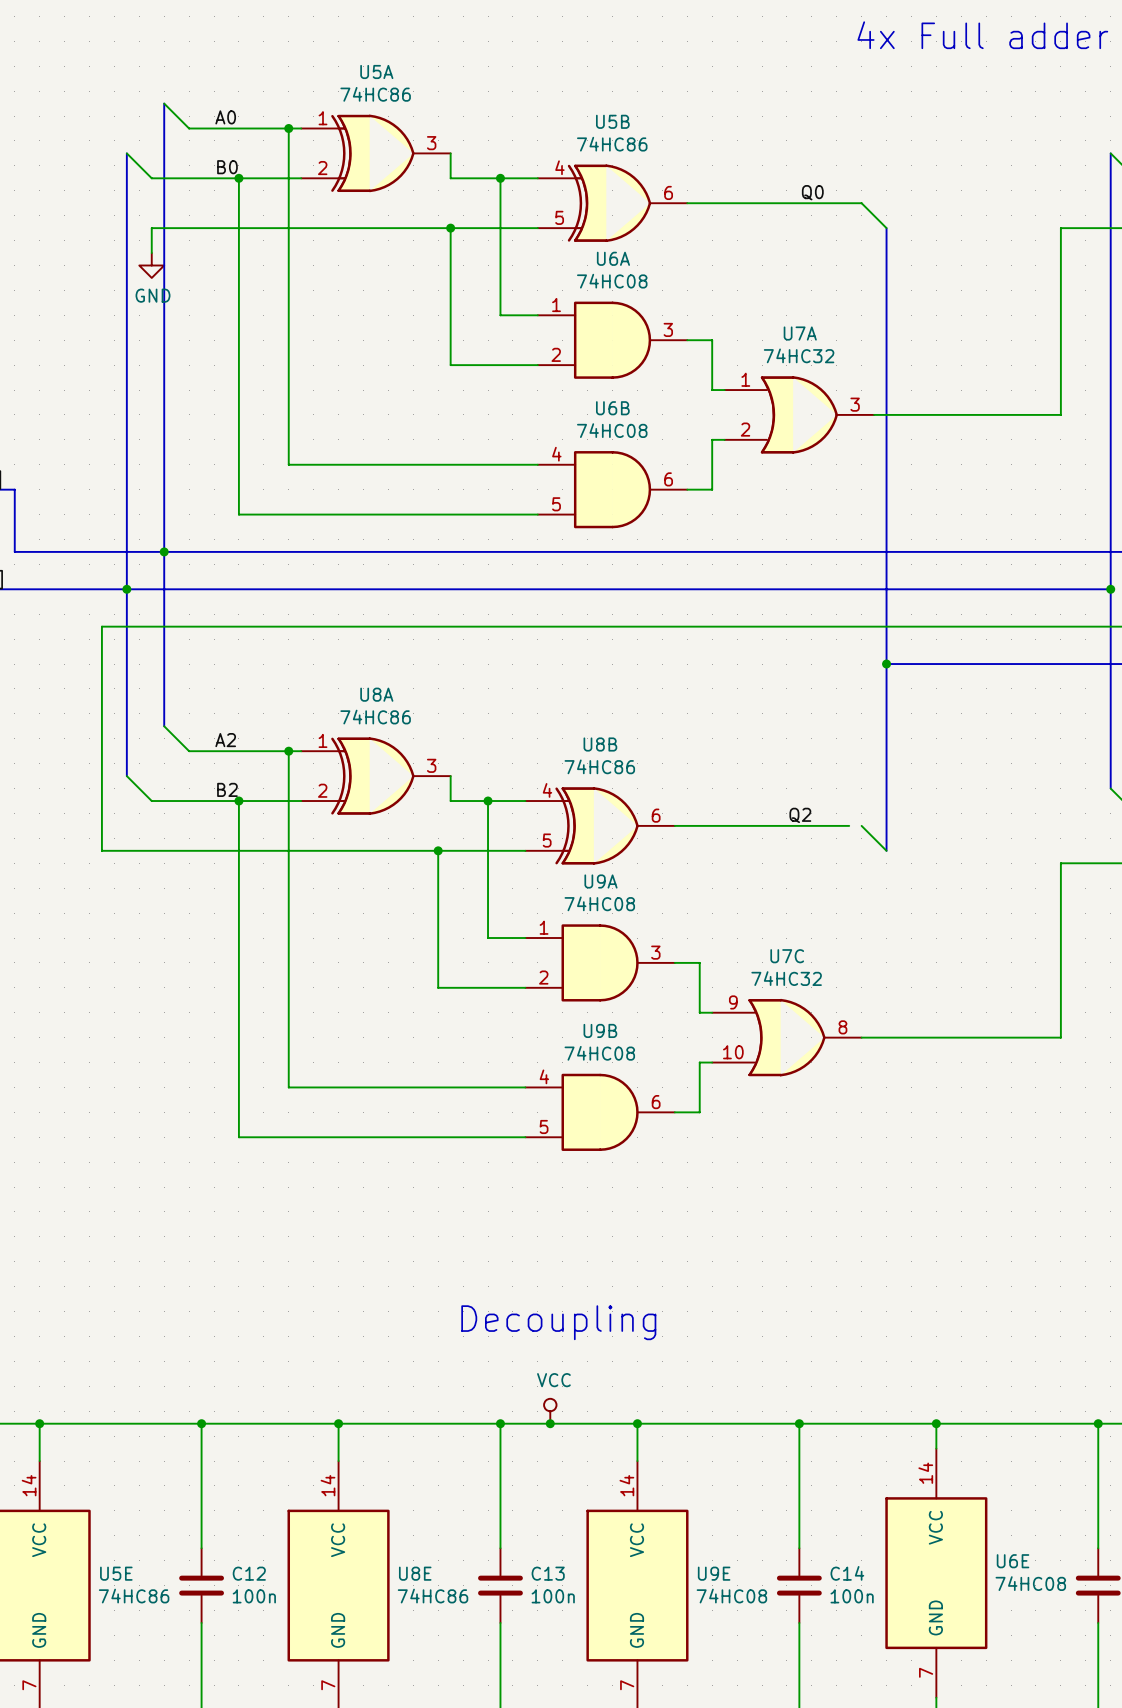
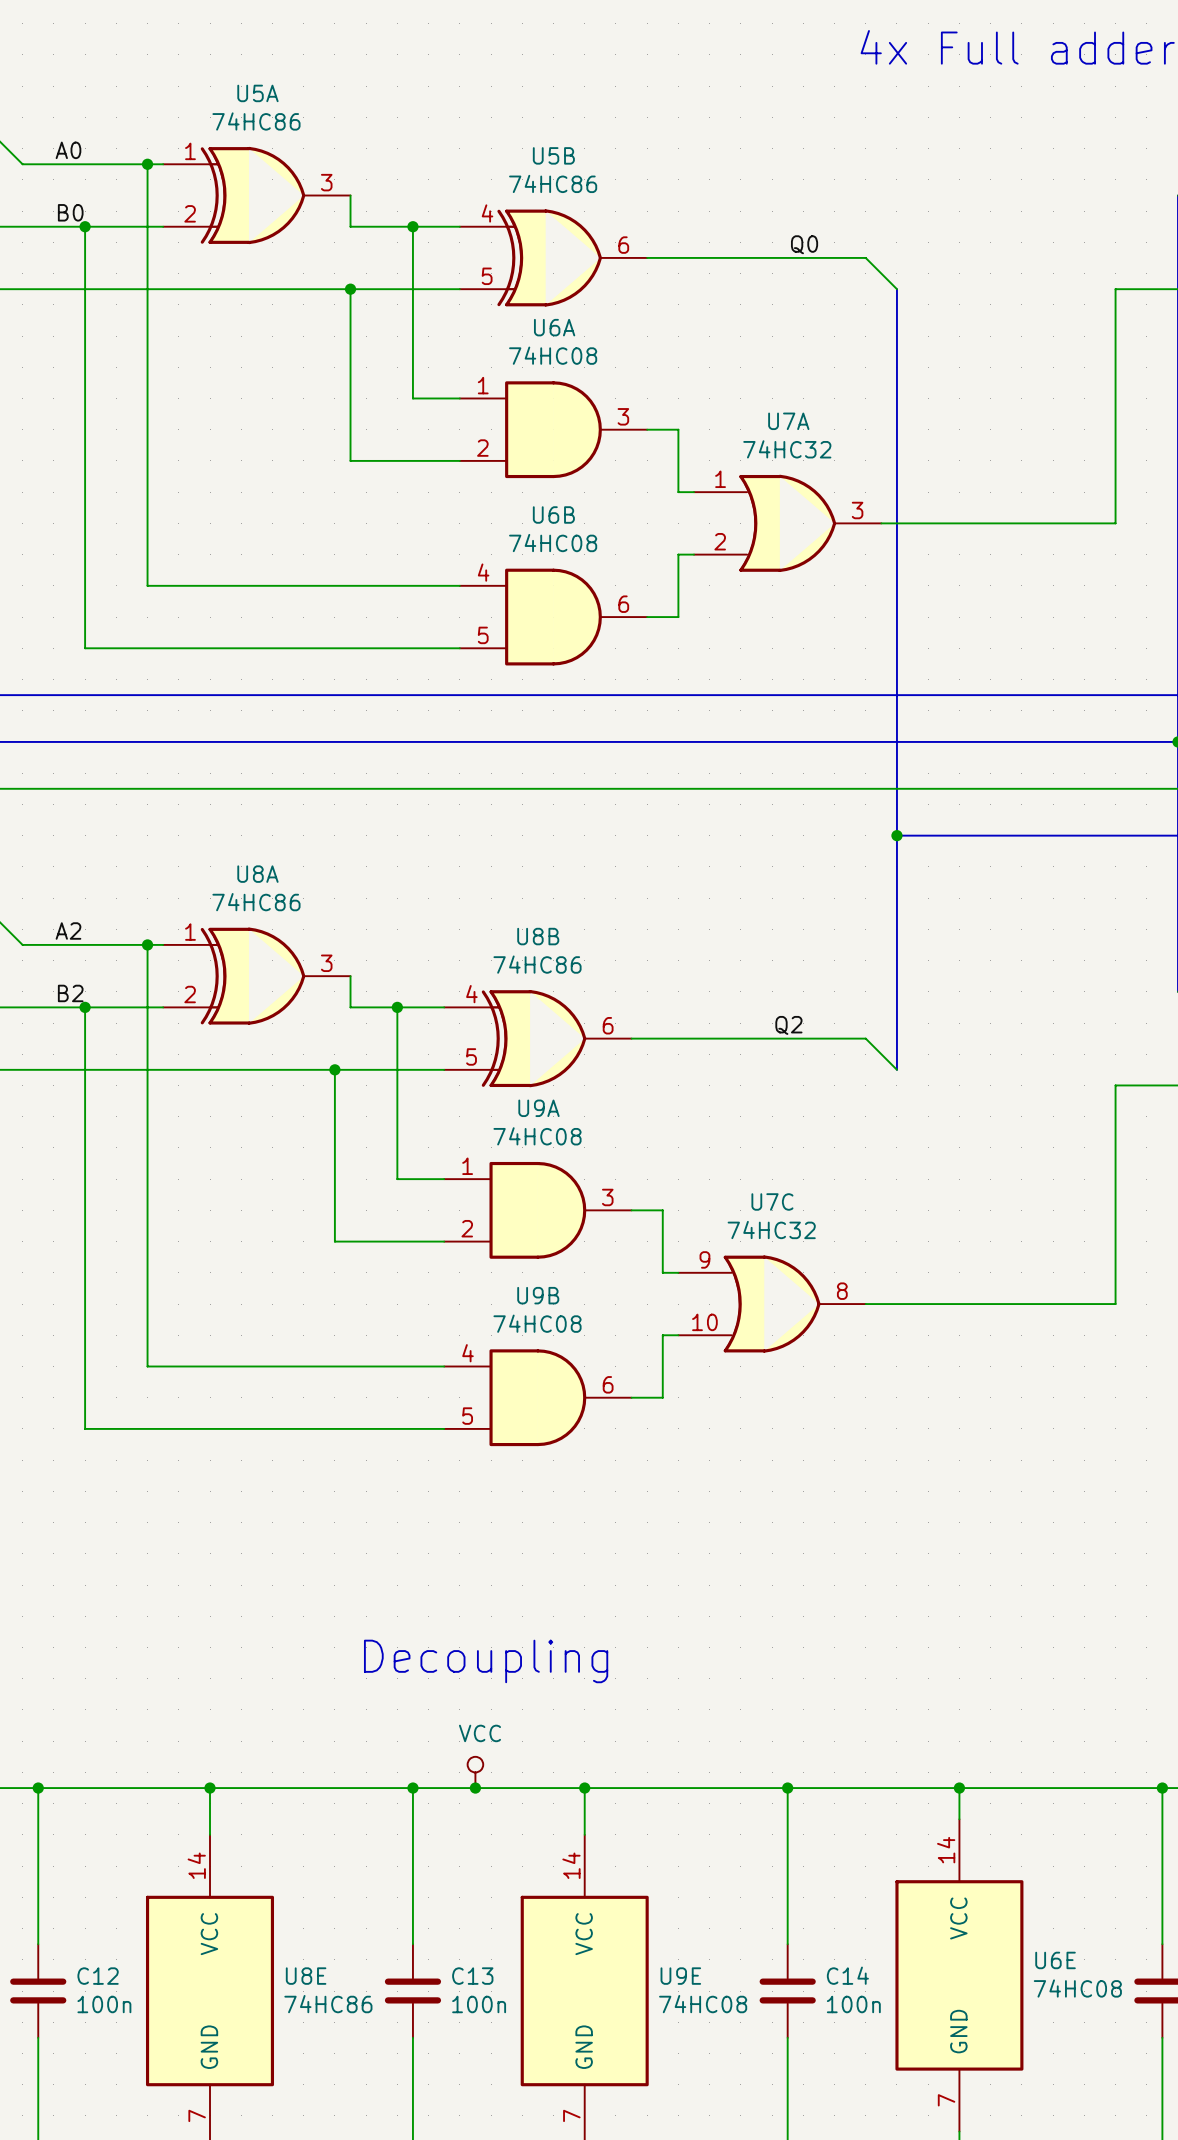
wire: none -> (850, 1038) (865, 1038)

